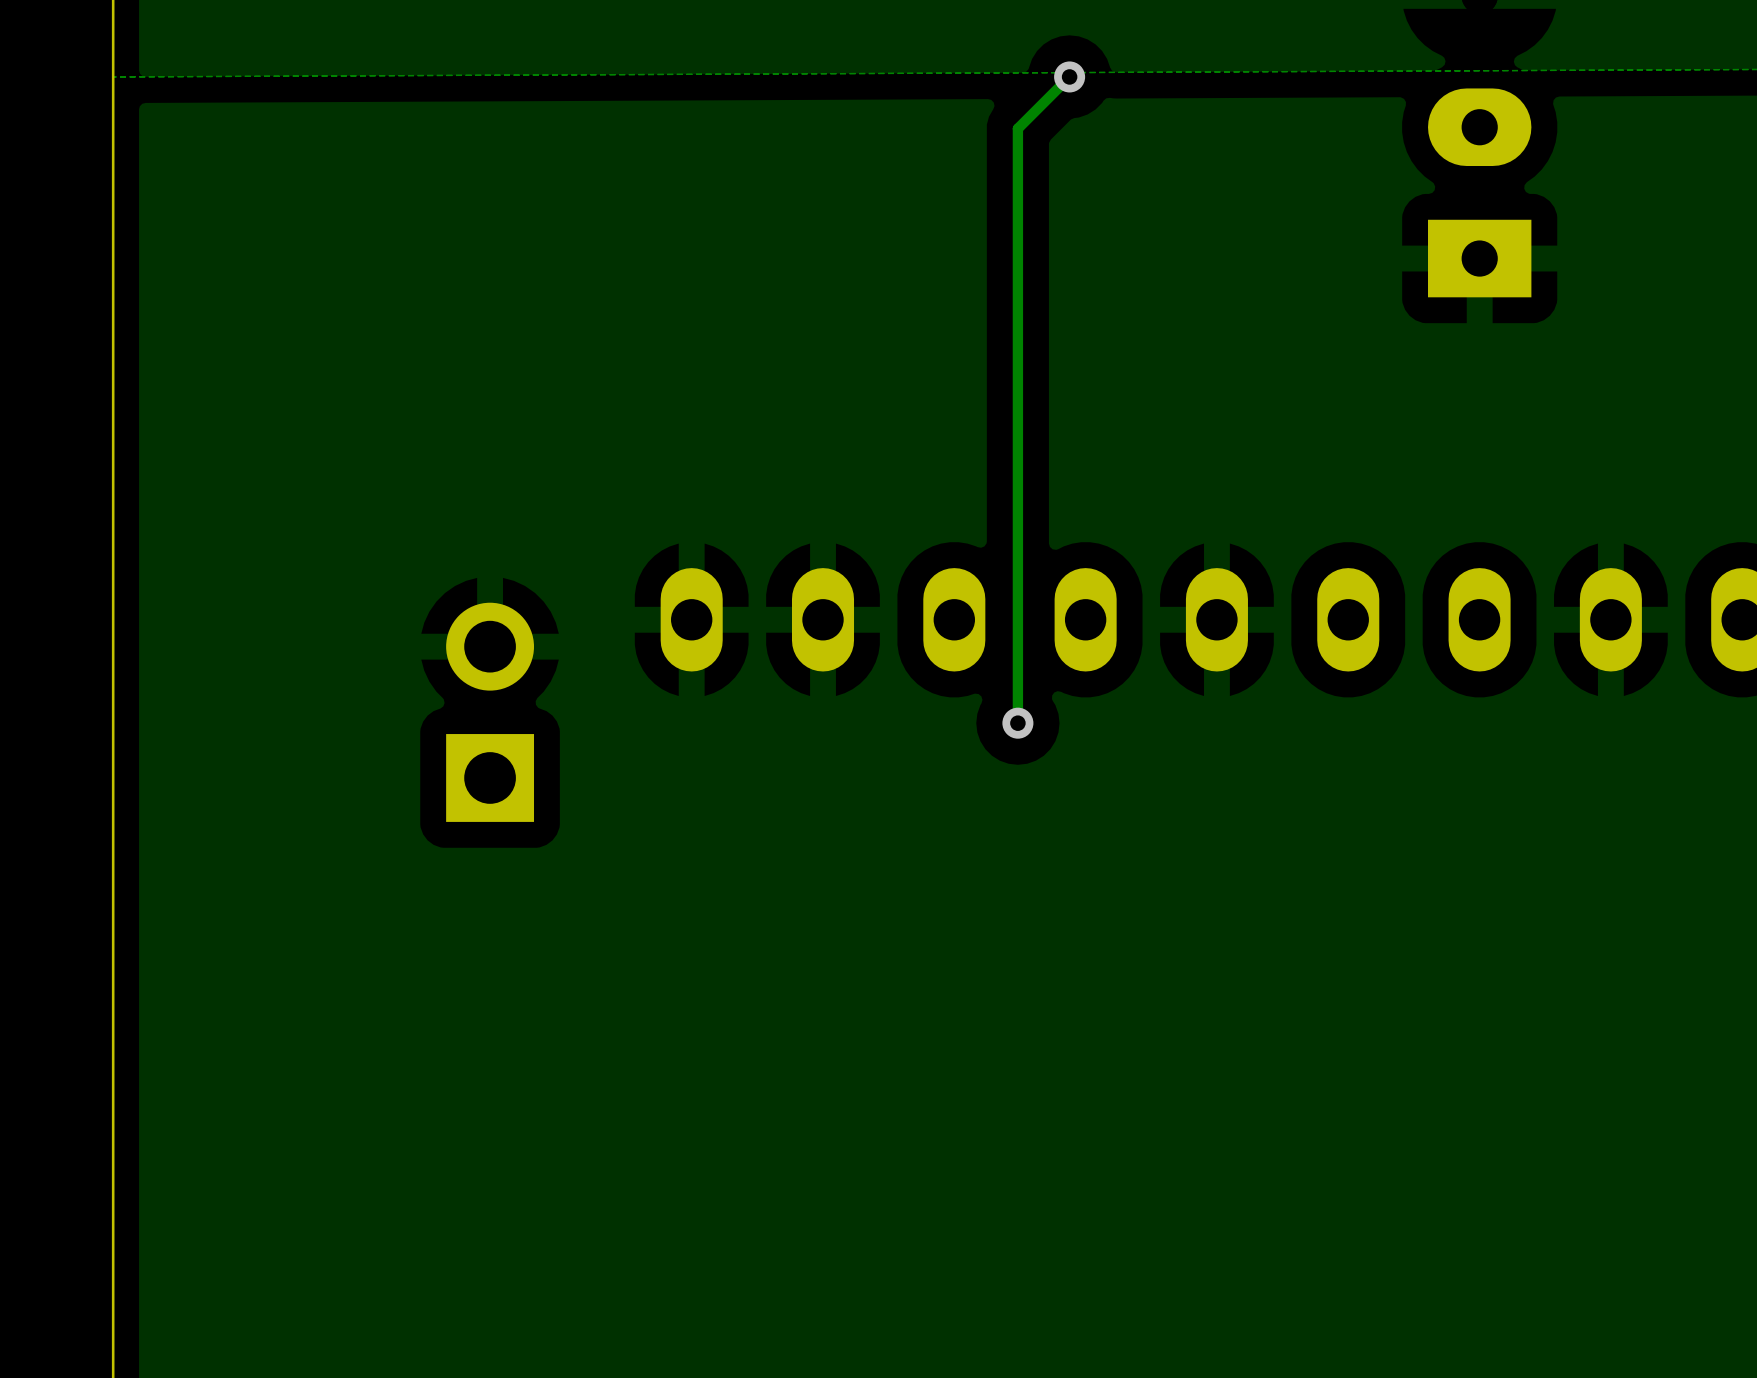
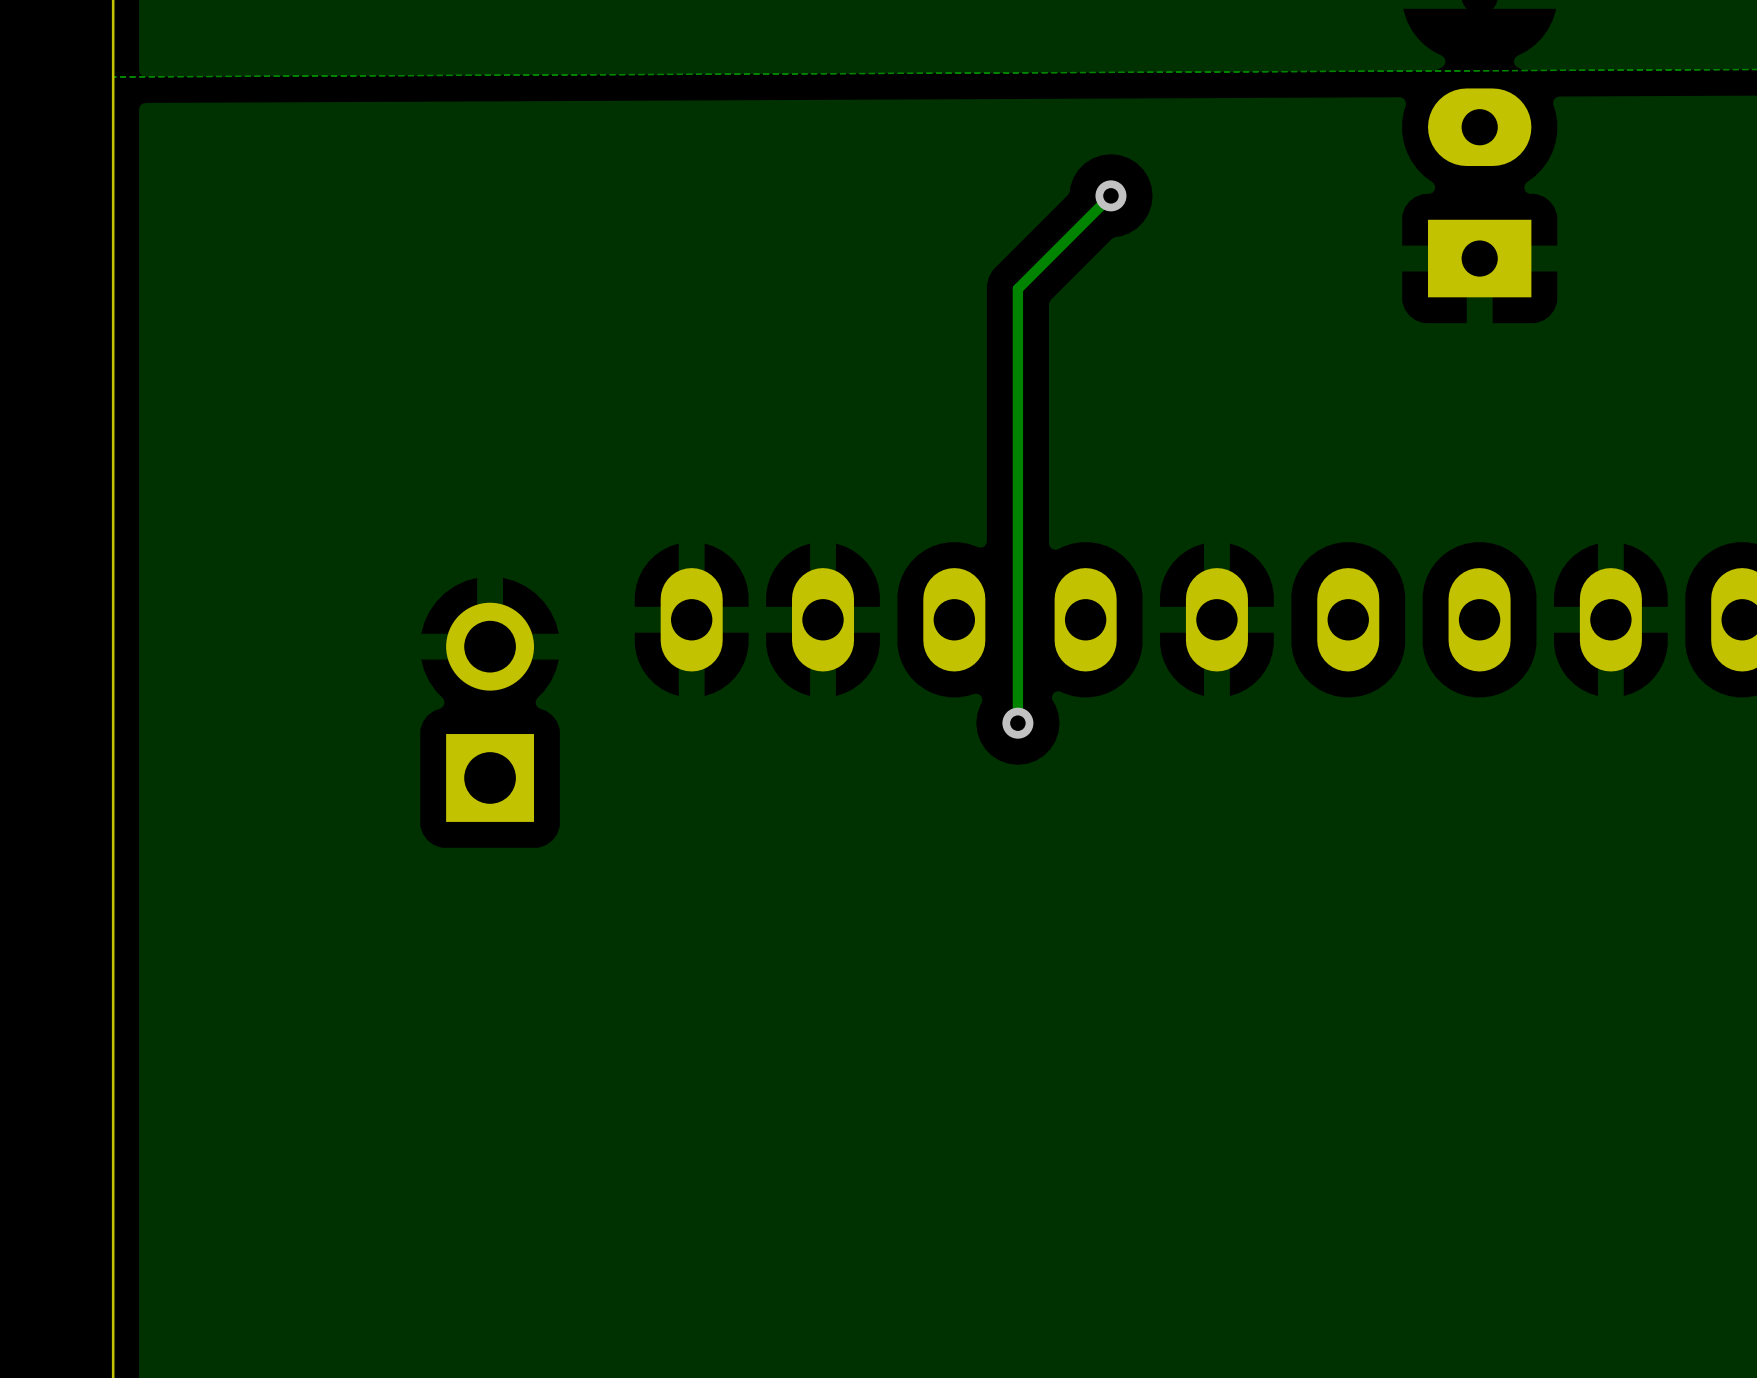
track: (1069, 76) (1017, 128) (1017, 288) -> (1110, 195) (1017, 288)
via: (1069, 76) -> none
via: none -> (1110, 195)

